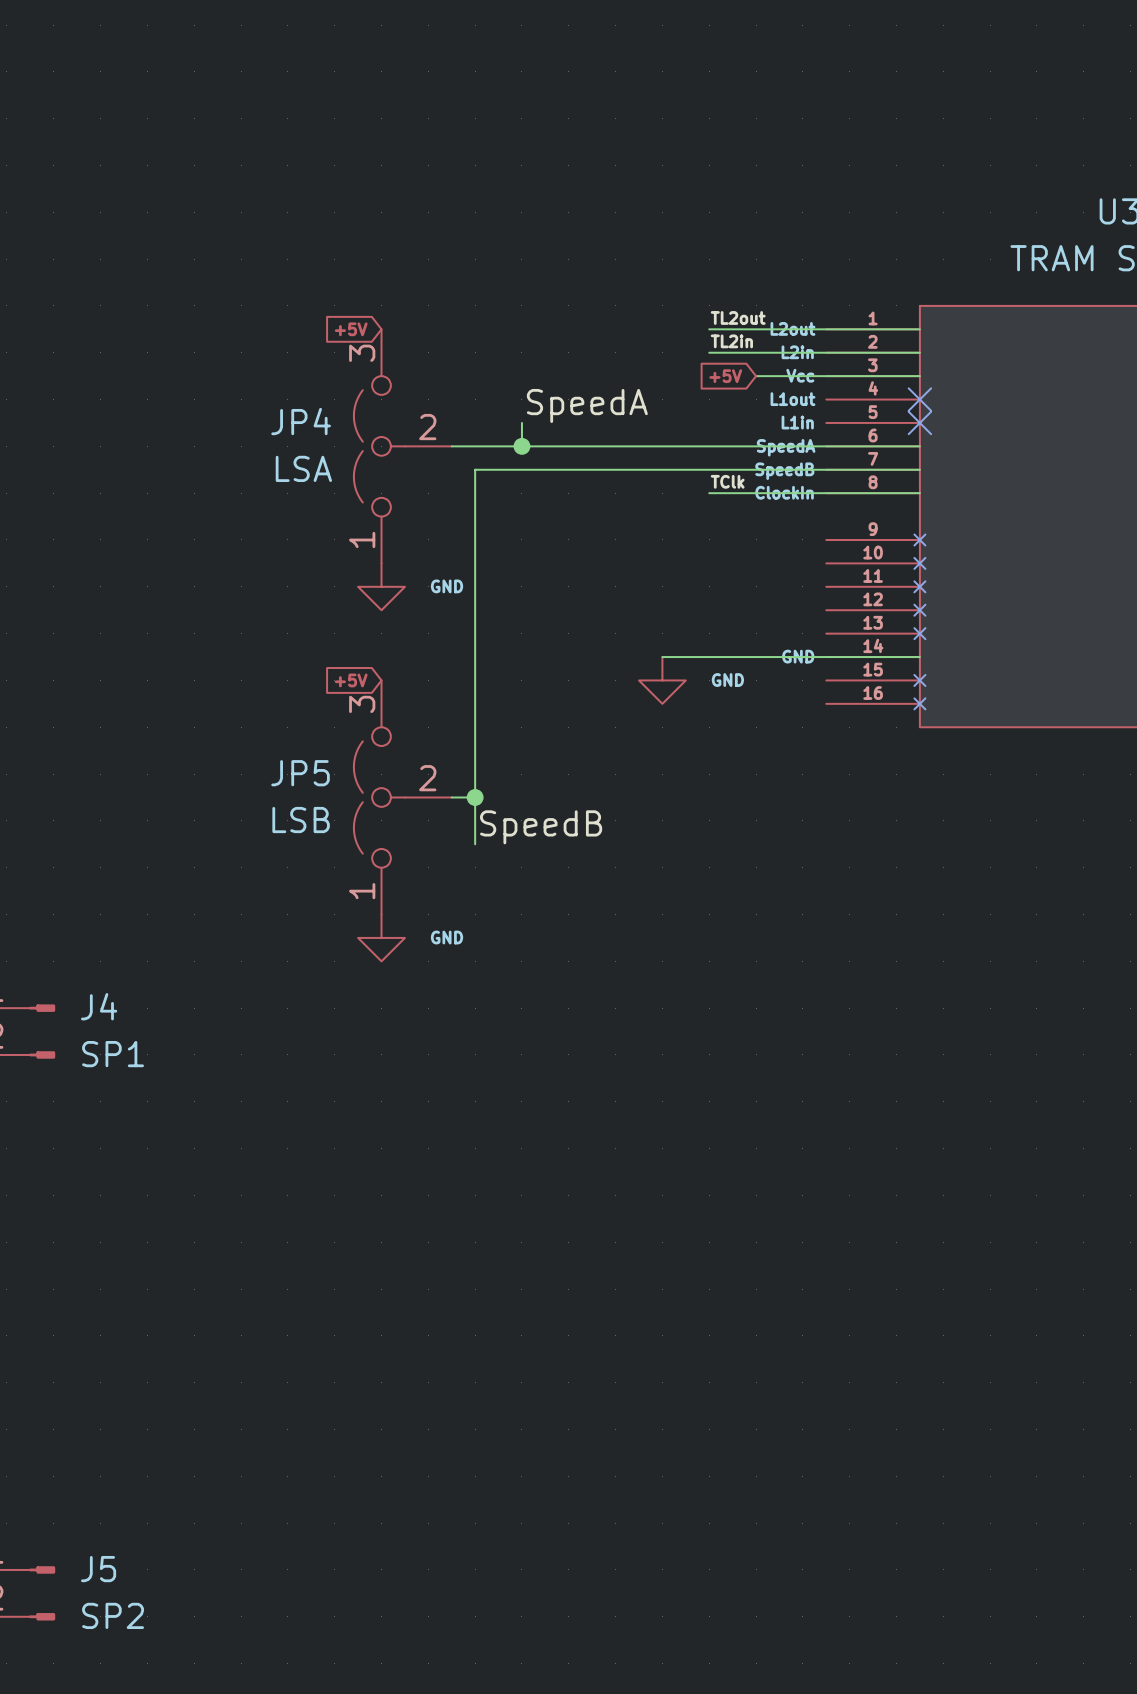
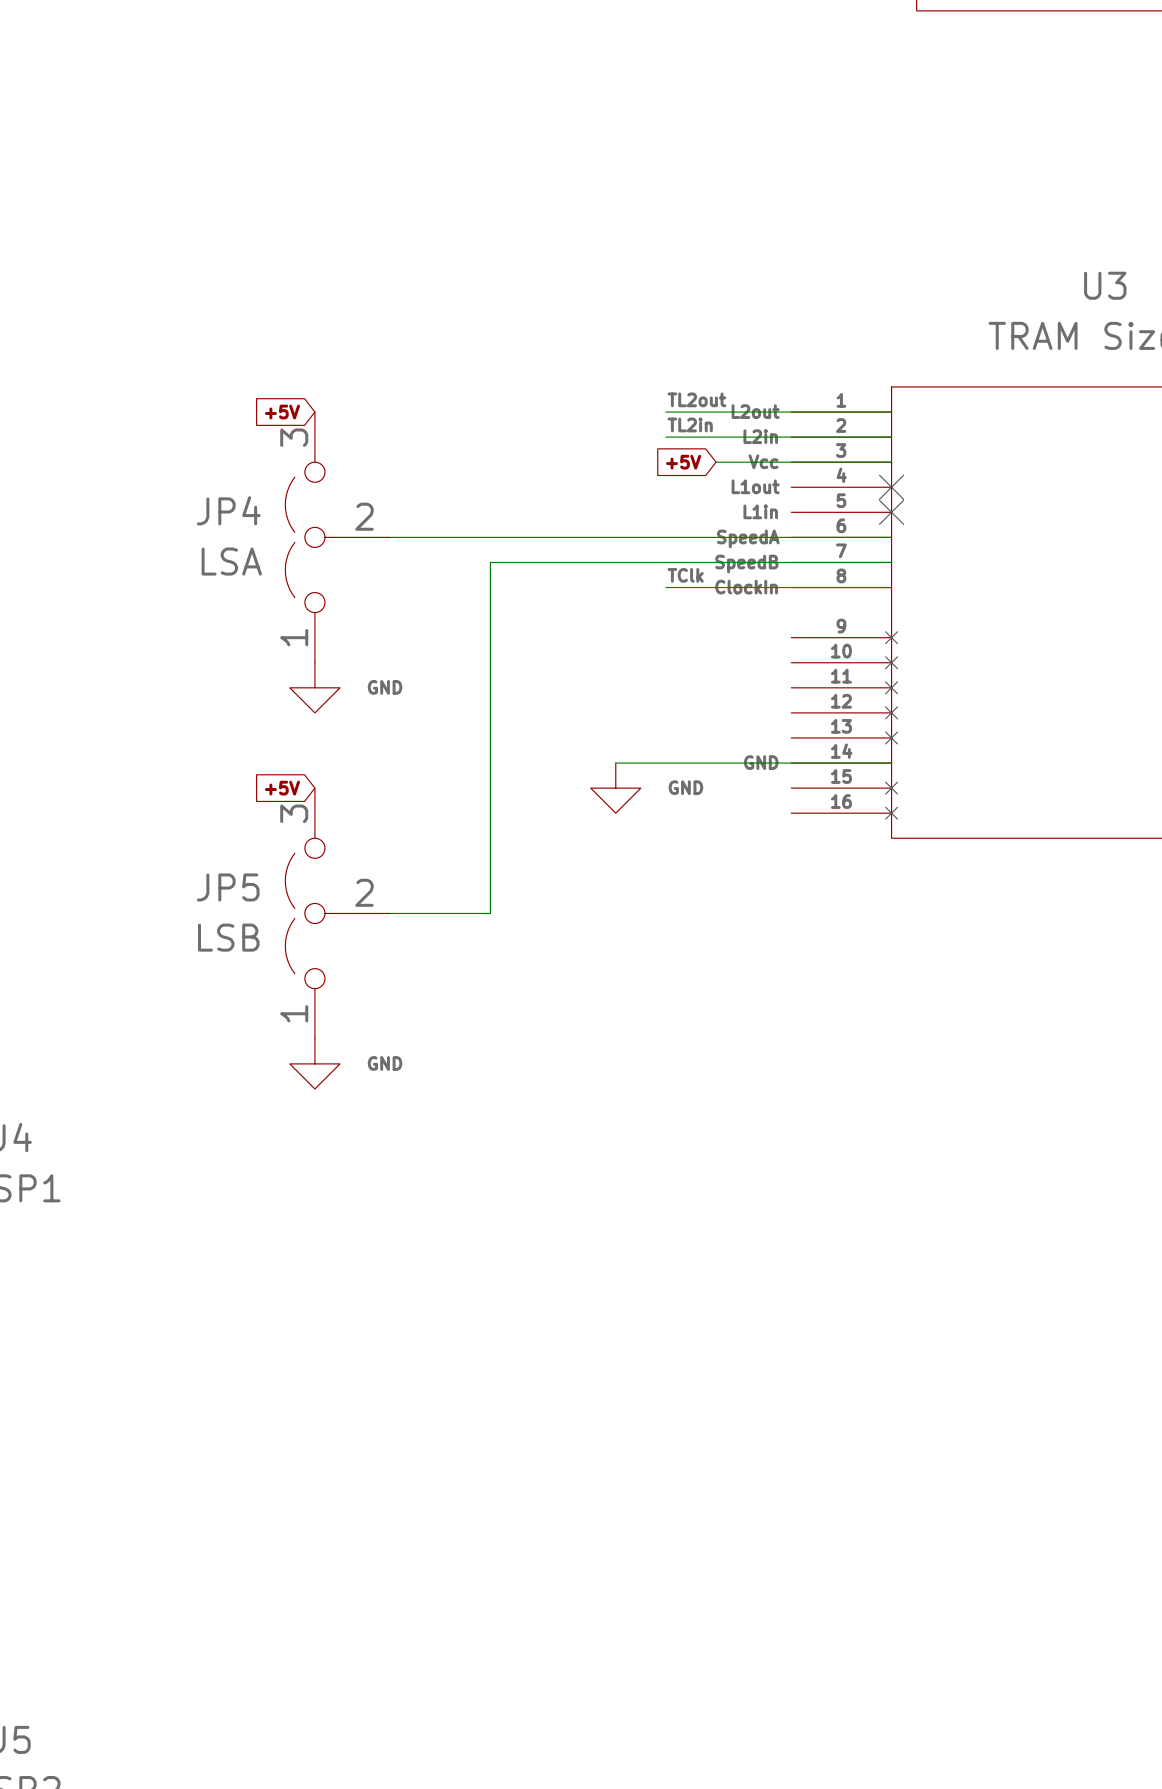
label: SpeedA (587, 405) -> none
wire: (521, 422) (521, 446) -> none
junction: (521, 446) -> none
wire: (545, 469) (475, 469) (475, 844) -> (490, 562) (490, 913) (415, 913)
junction: (475, 797) -> none
label: SpeedB (541, 827) -> none

